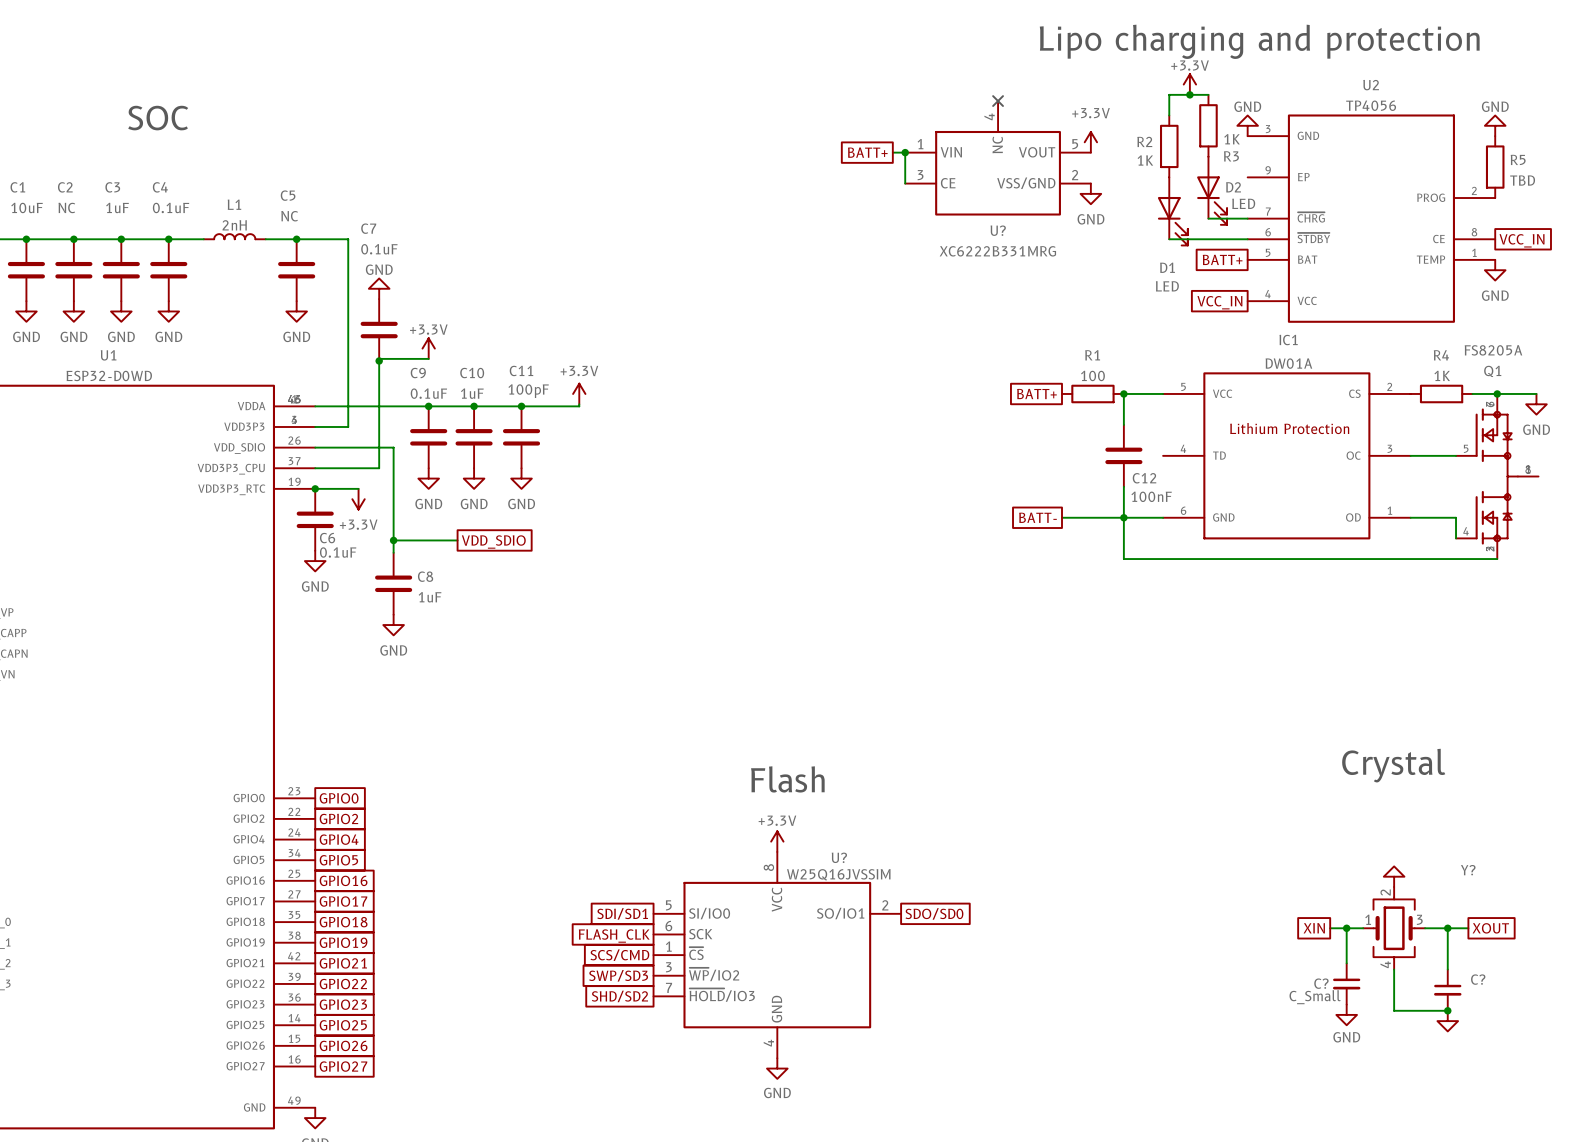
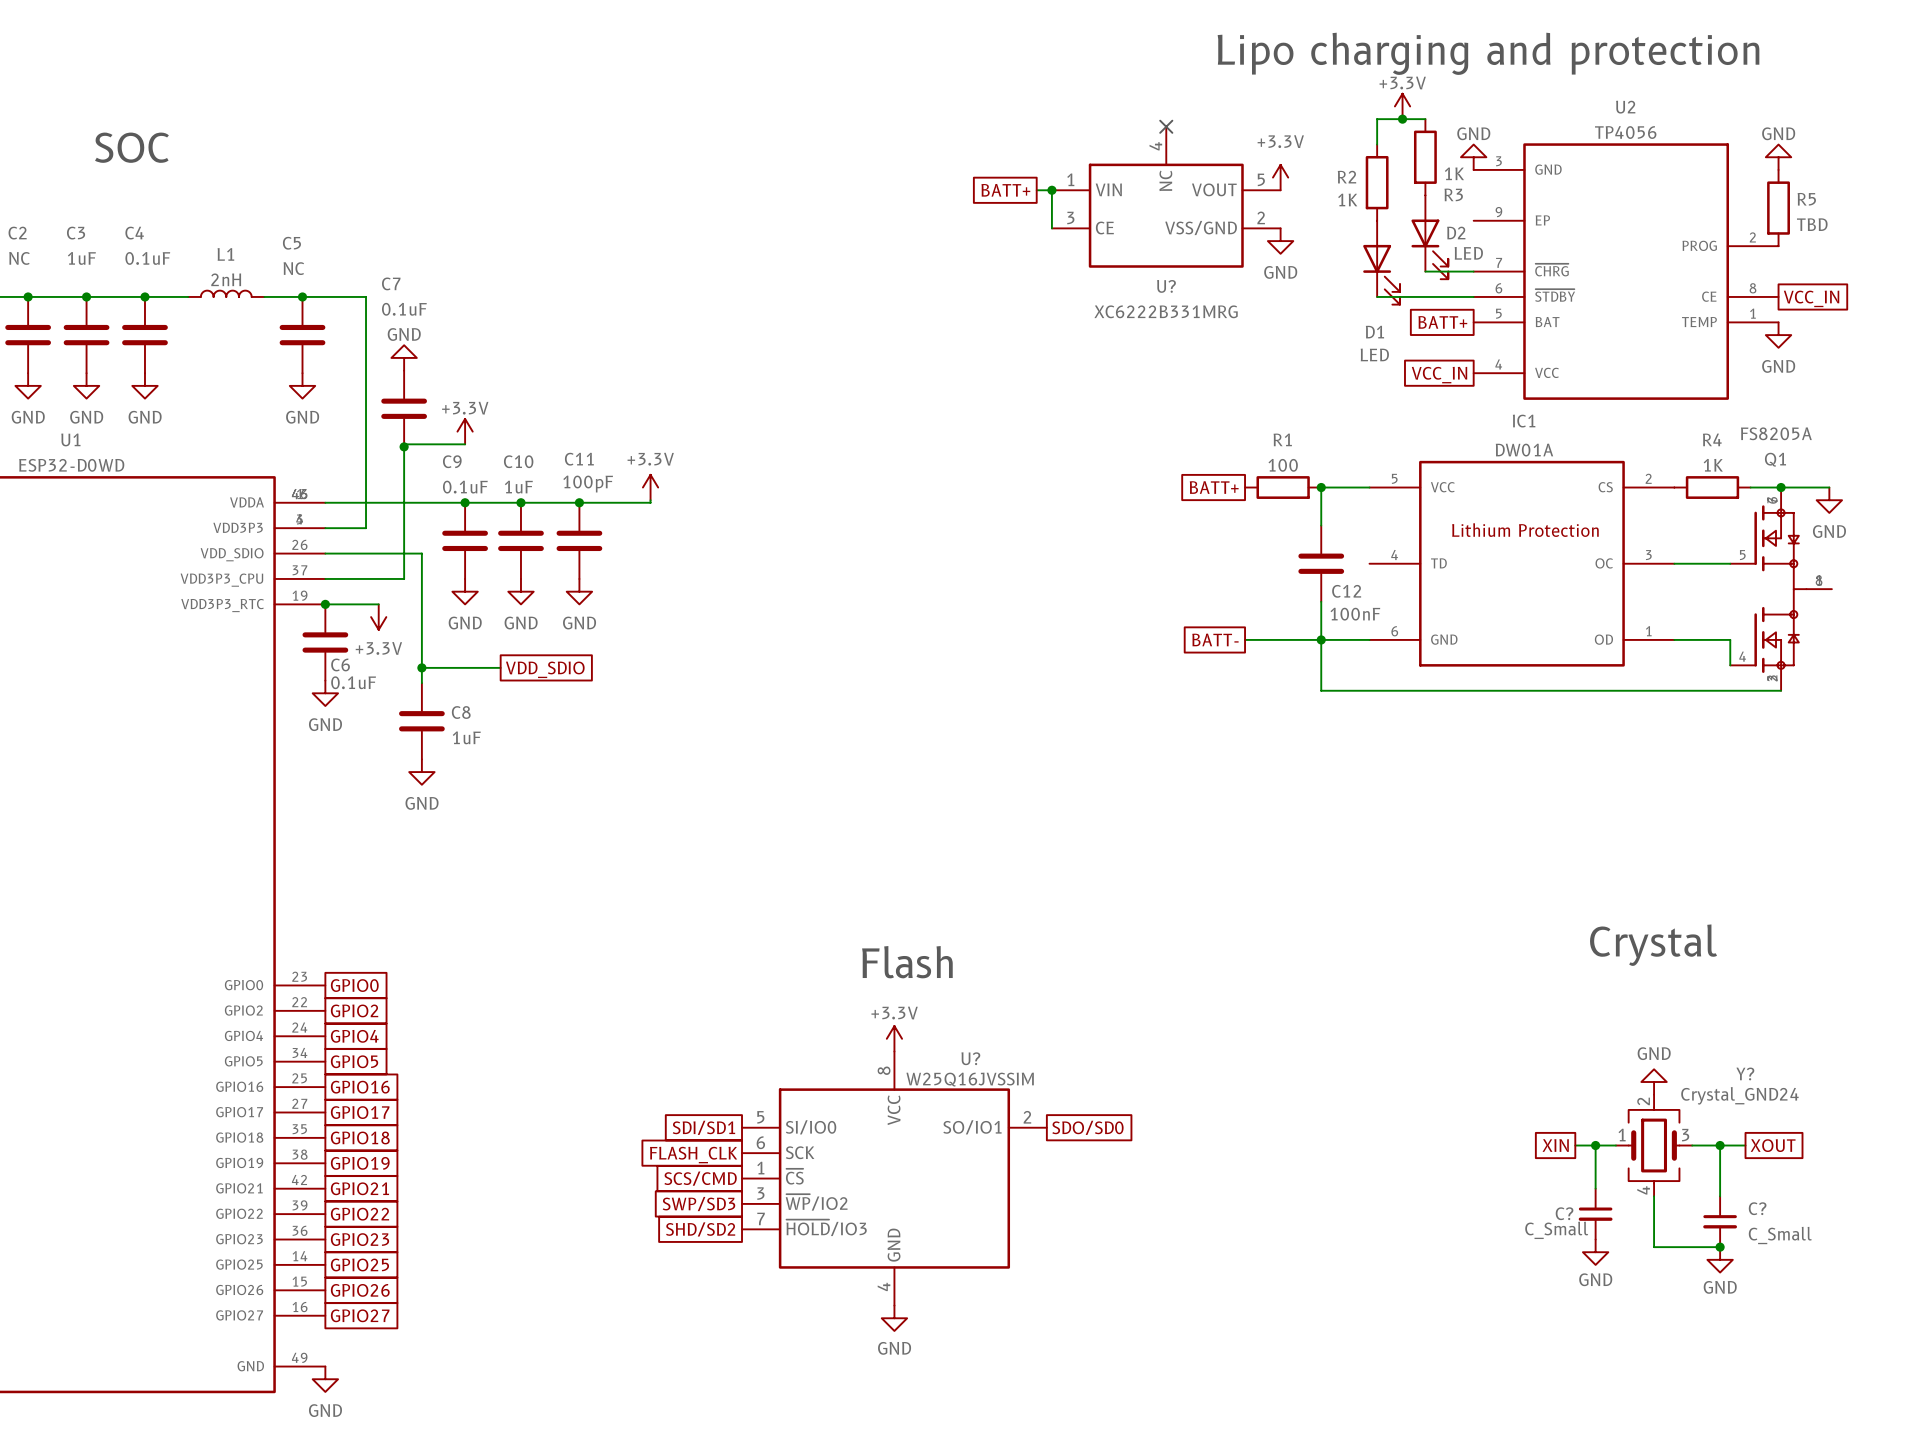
power symbol text: none -> GND (1654, 1053)
Y? value: none -> Crystal_GND24 (1739, 1095)
C? value: none -> C_Small (1780, 1235)
power symbol text: none -> GND (1720, 1287)

